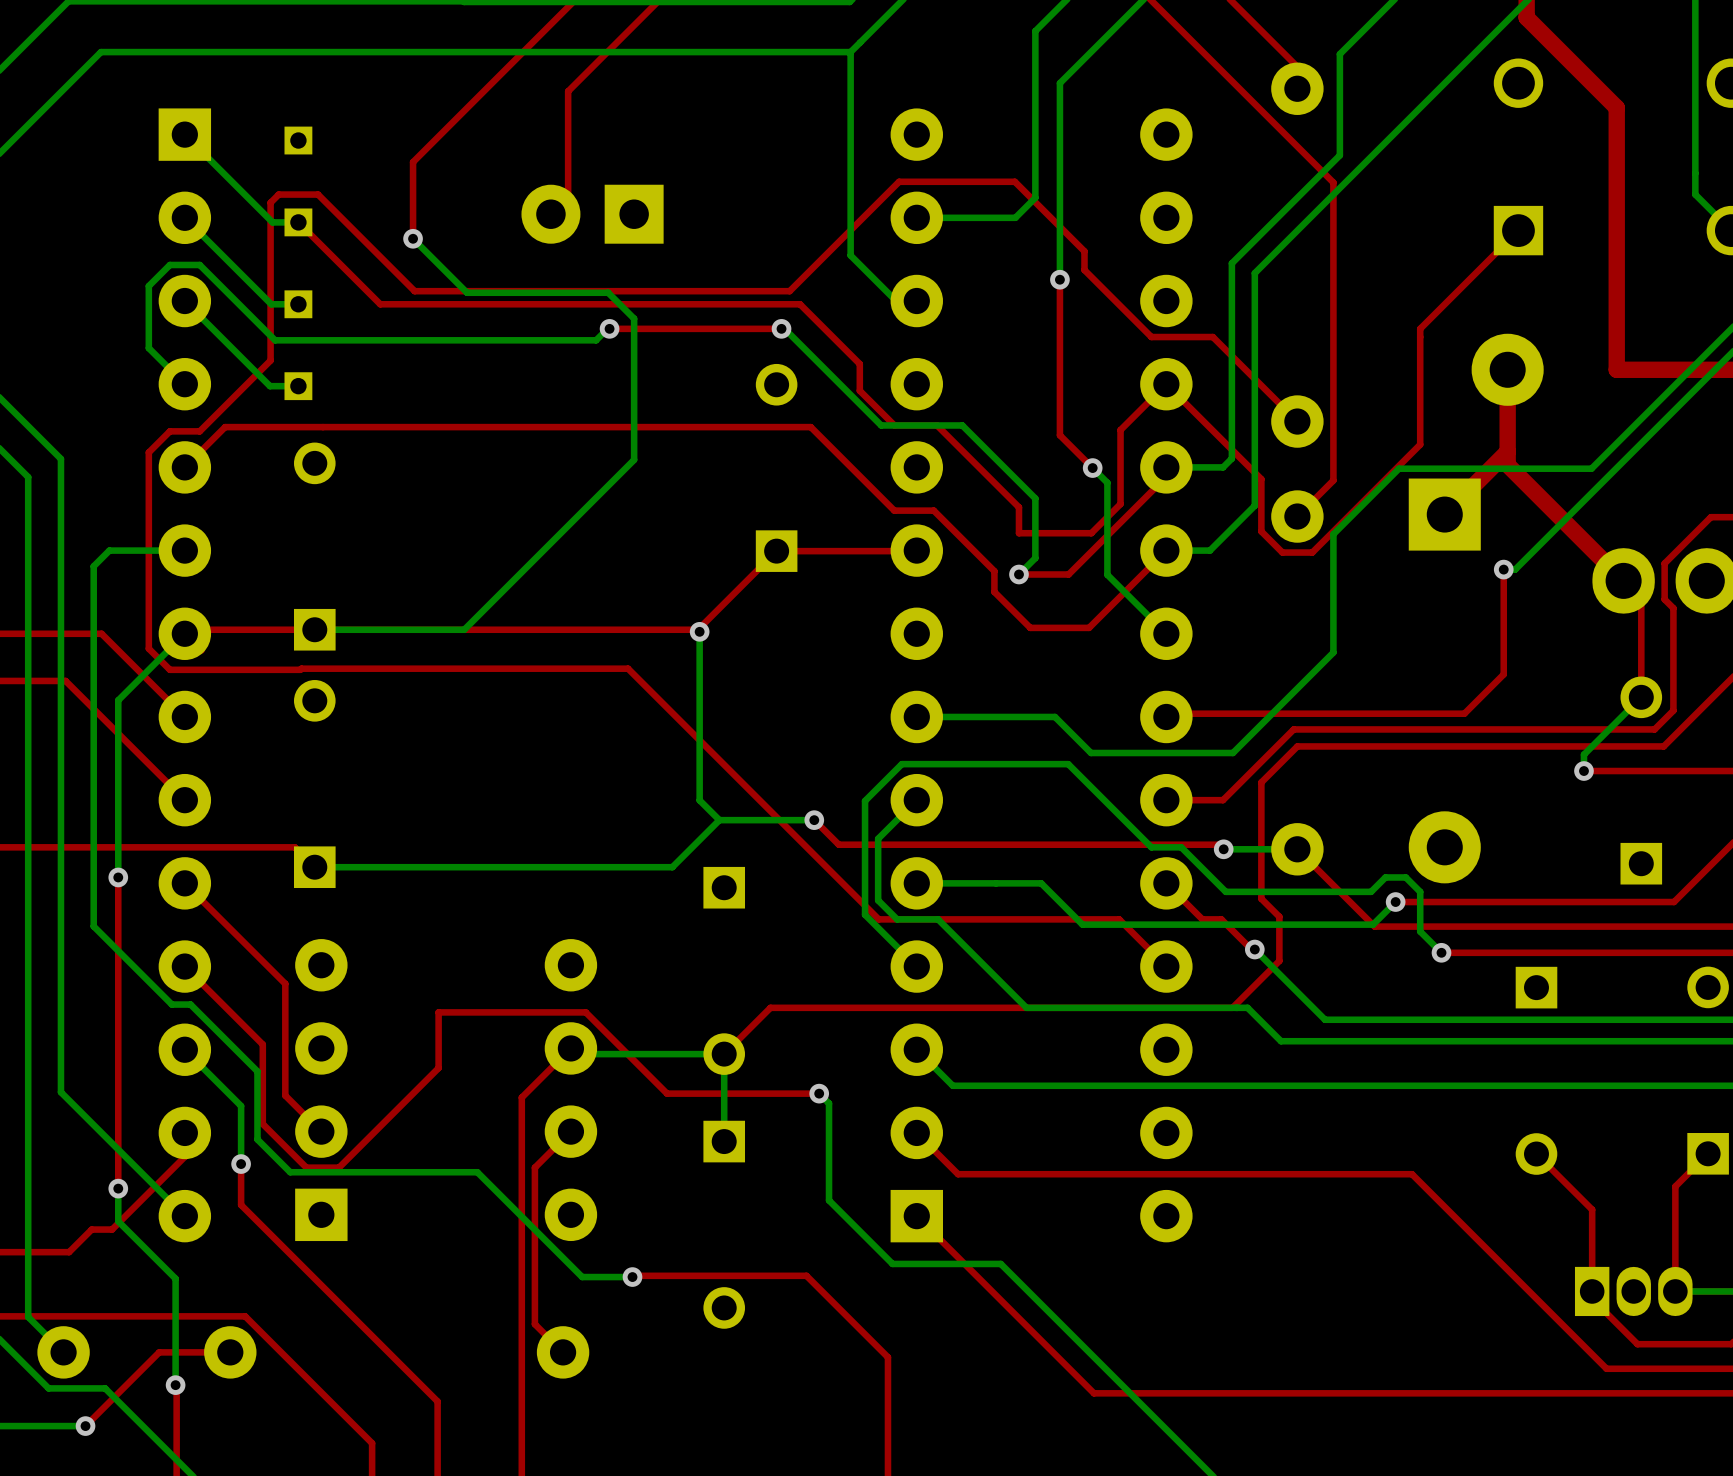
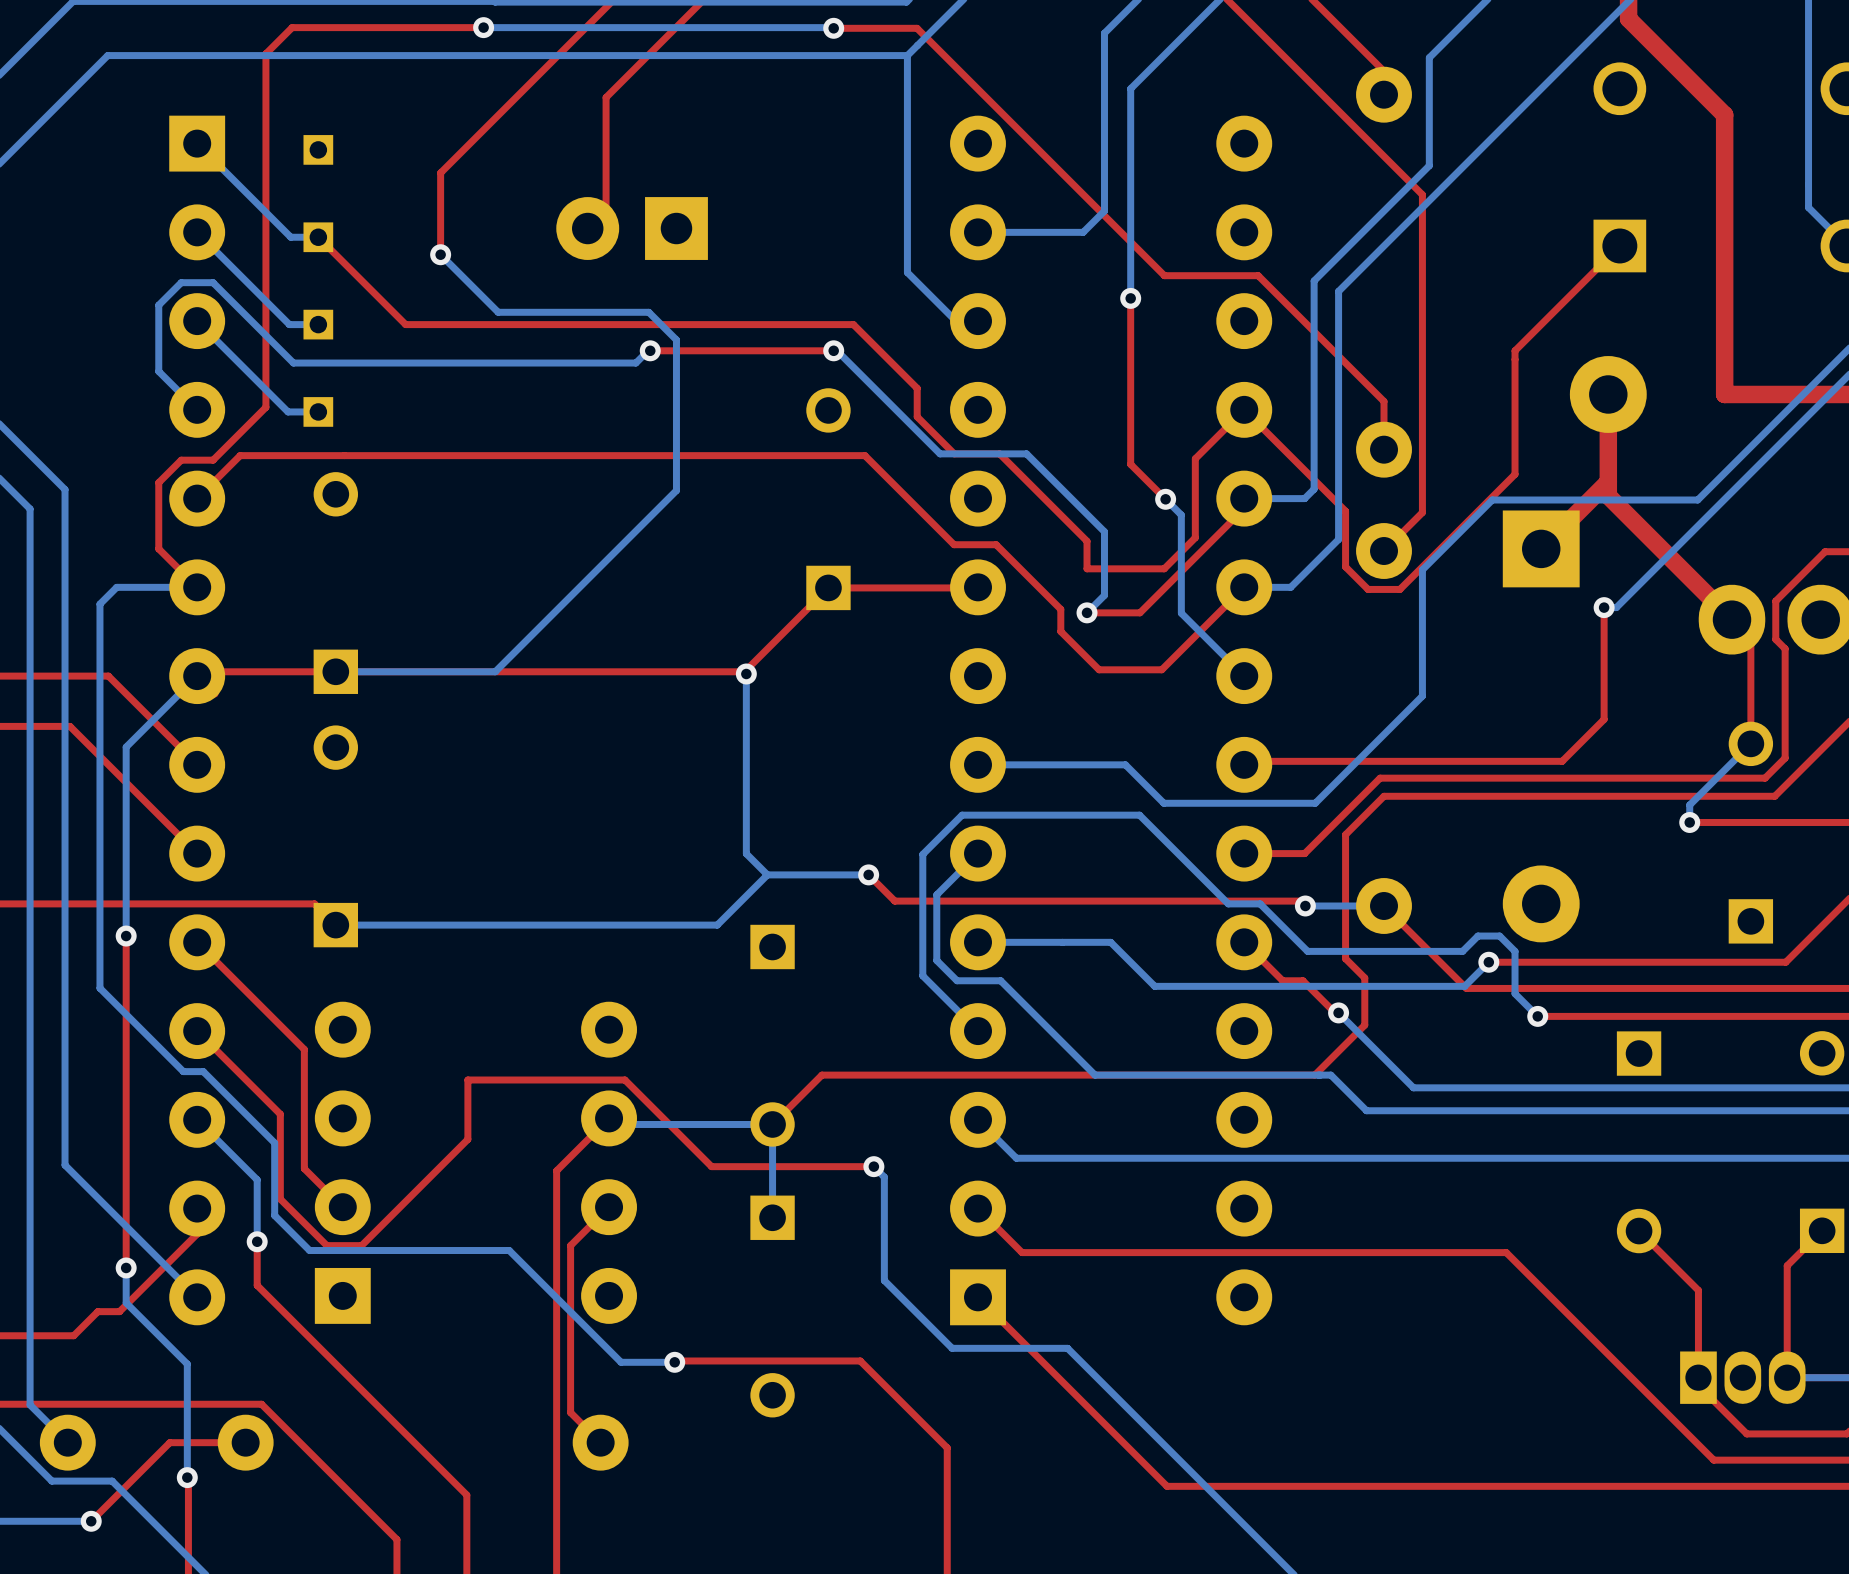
bottom track: none -> (483, 27) (833, 28)
via: none -> (483, 27)
top track: none -> (833, 28) (917, 28) (1082, 193)
via: none -> (833, 28)
top track: (1014, 181) (899, 181) (789, 291) (414, 291) (318, 194) (278, 194) (270, 202) (270, 360) (249, 381) -> (483, 27) (292, 27) (265, 53) (265, 407)
top track: (1084, 251) (1084, 270) (1151, 337) (1212, 337) (1297, 421) -> (1156, 268) (1164, 275) (1258, 275) (1384, 401) (1384, 449)
top track: (148, 514) (148, 648) (169, 669) (628, 668) (878, 919) (1119, 919) (1166, 966) -> (158, 548) (197, 587)

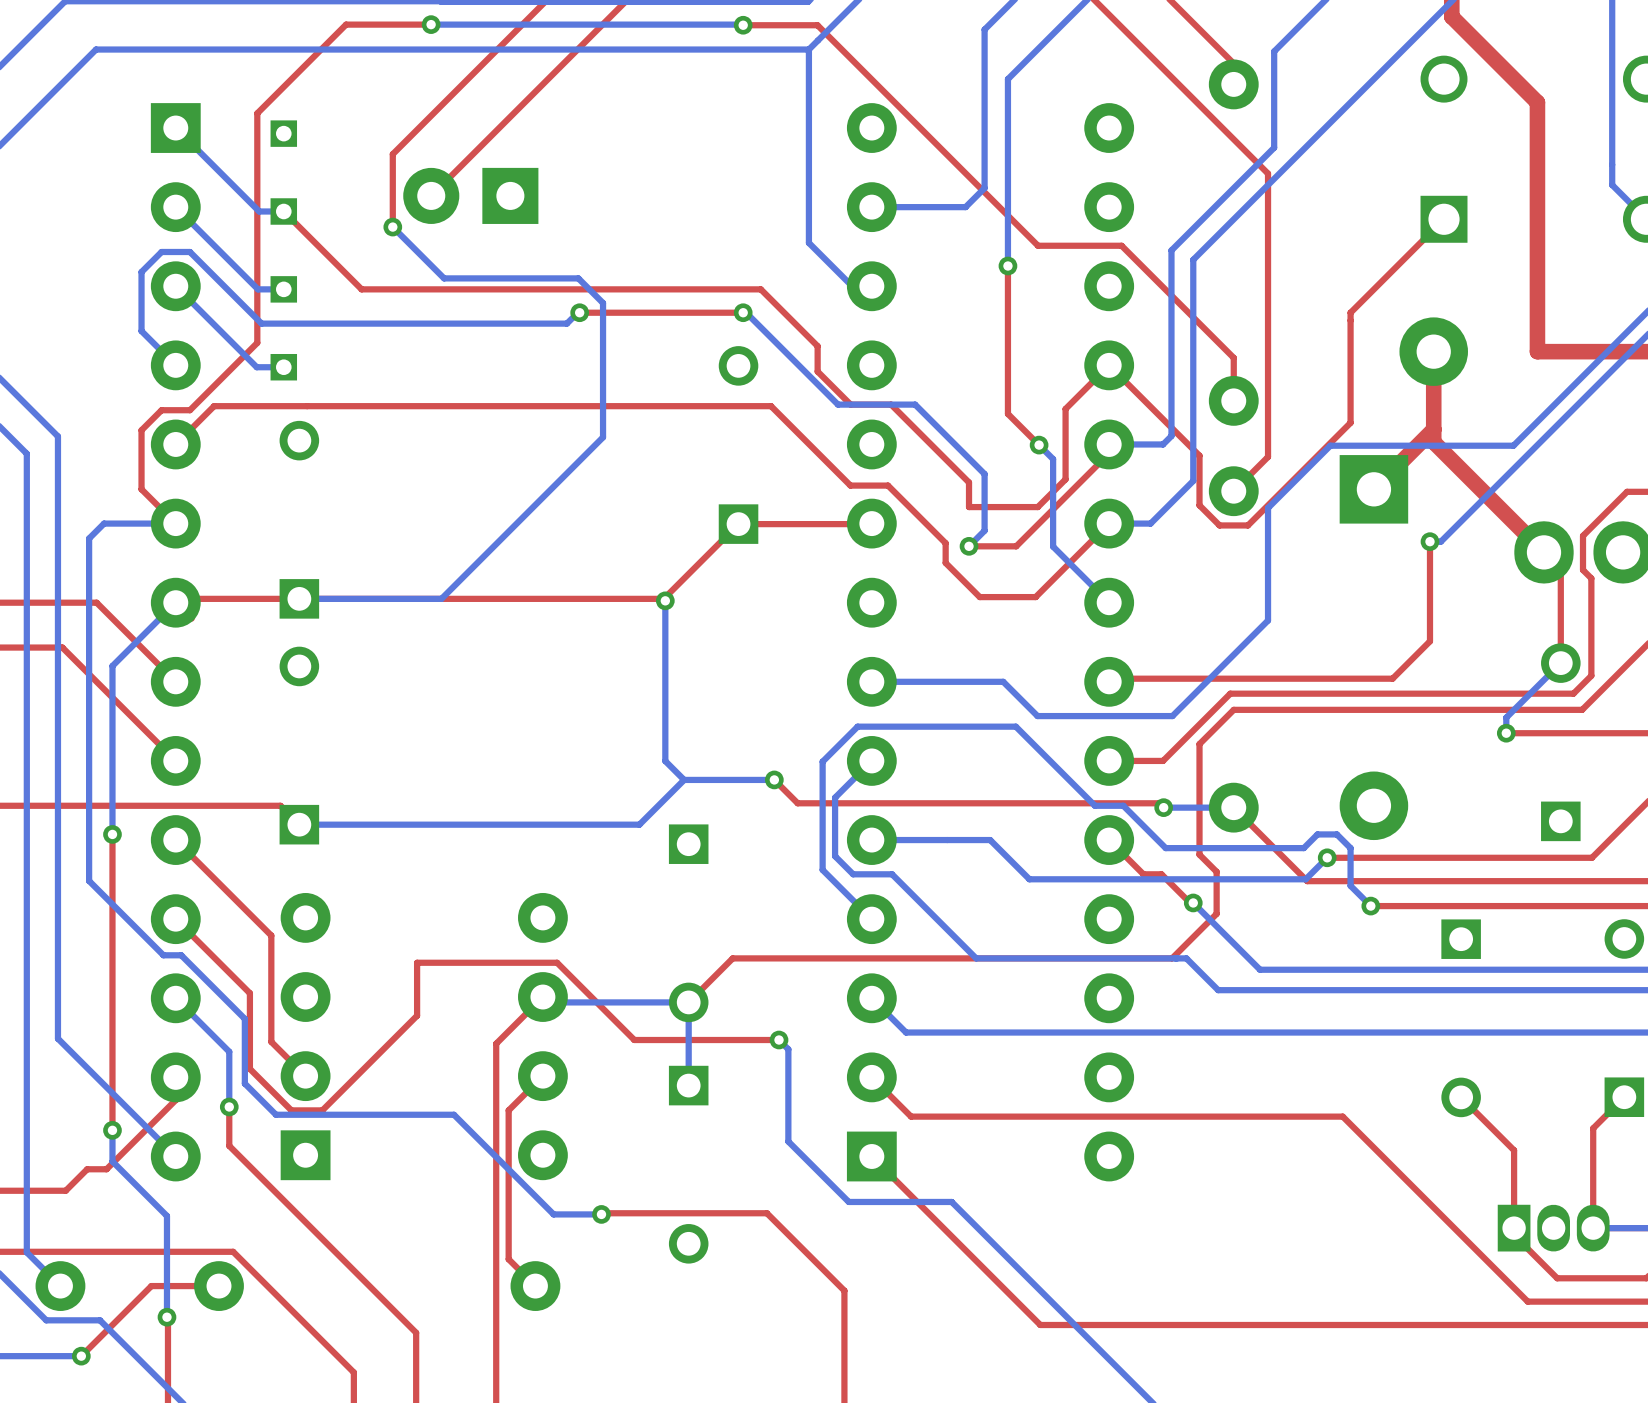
top track: (388, 27) (292, 27) (265, 53) (265, 407) -> (346, 24) (257, 113) (257, 342) (237, 363)
top track: (606, 97) (606, 210) (587, 228) -> (540, 86) (431, 195)
part position: (632, 228) -> (470, 195)

